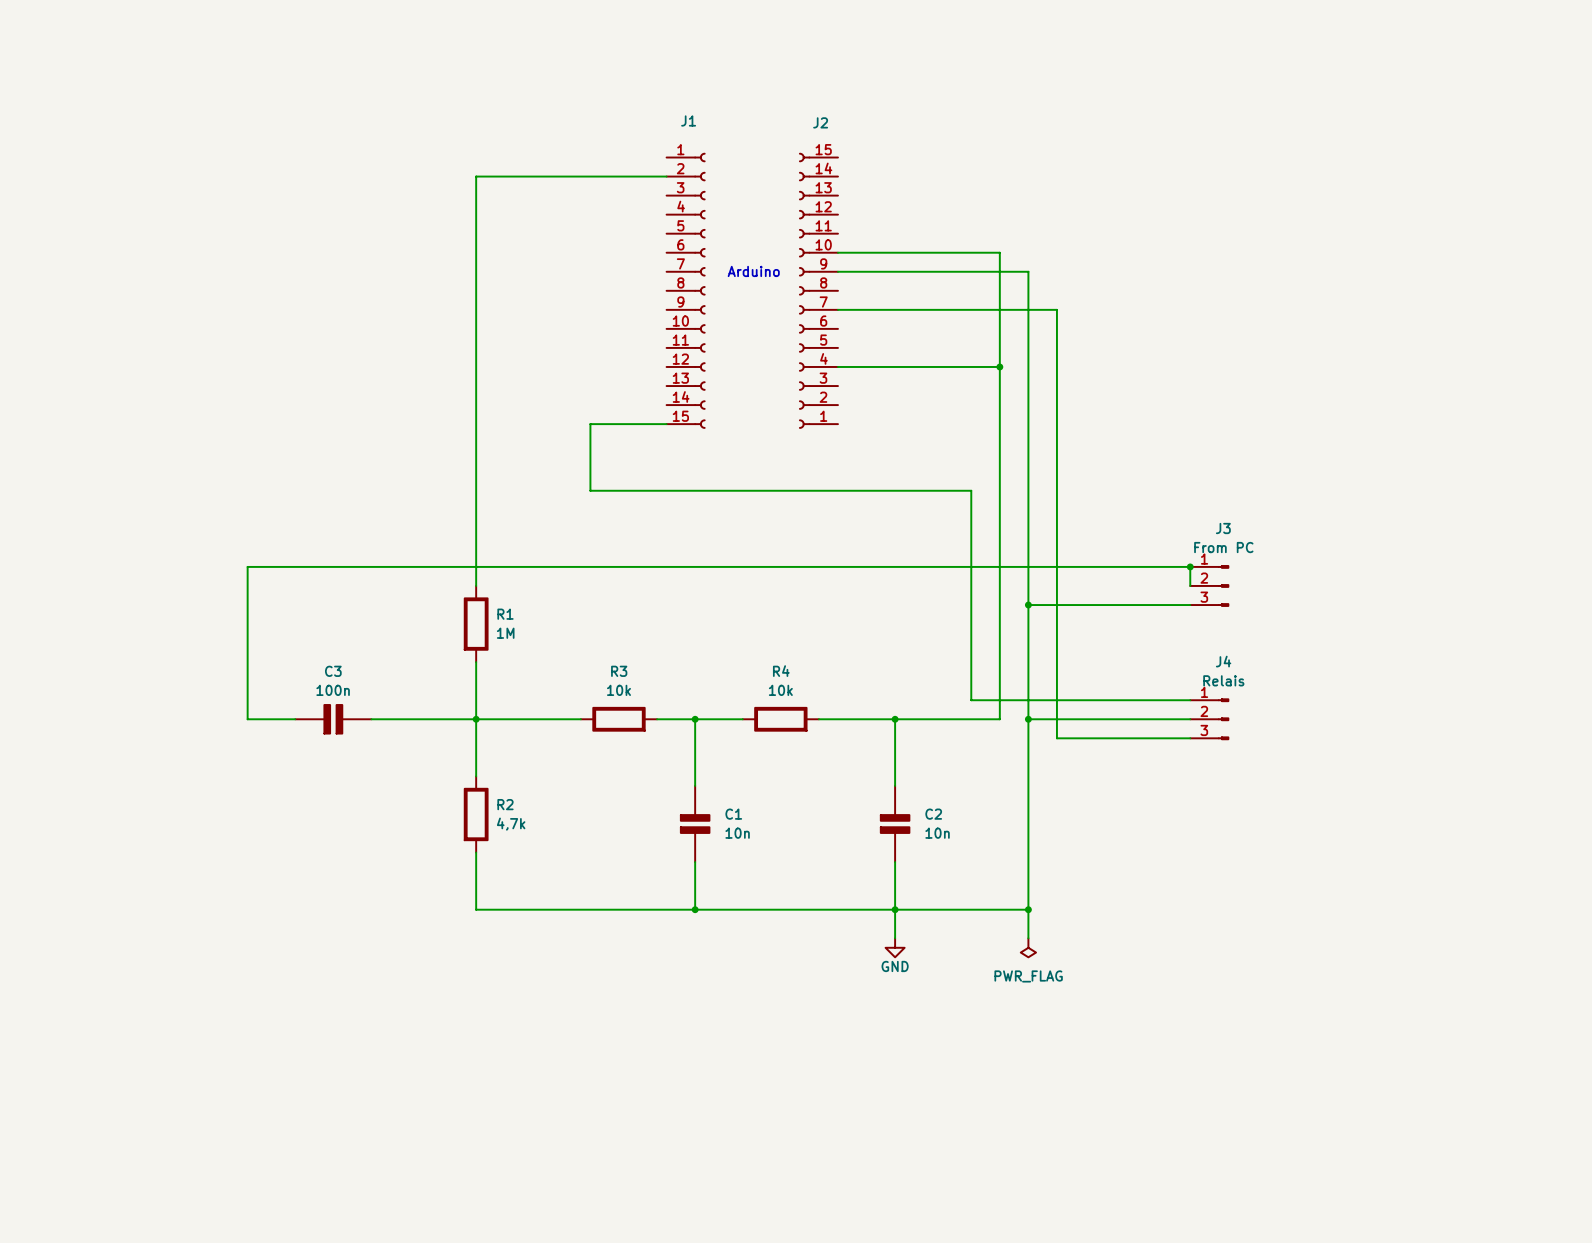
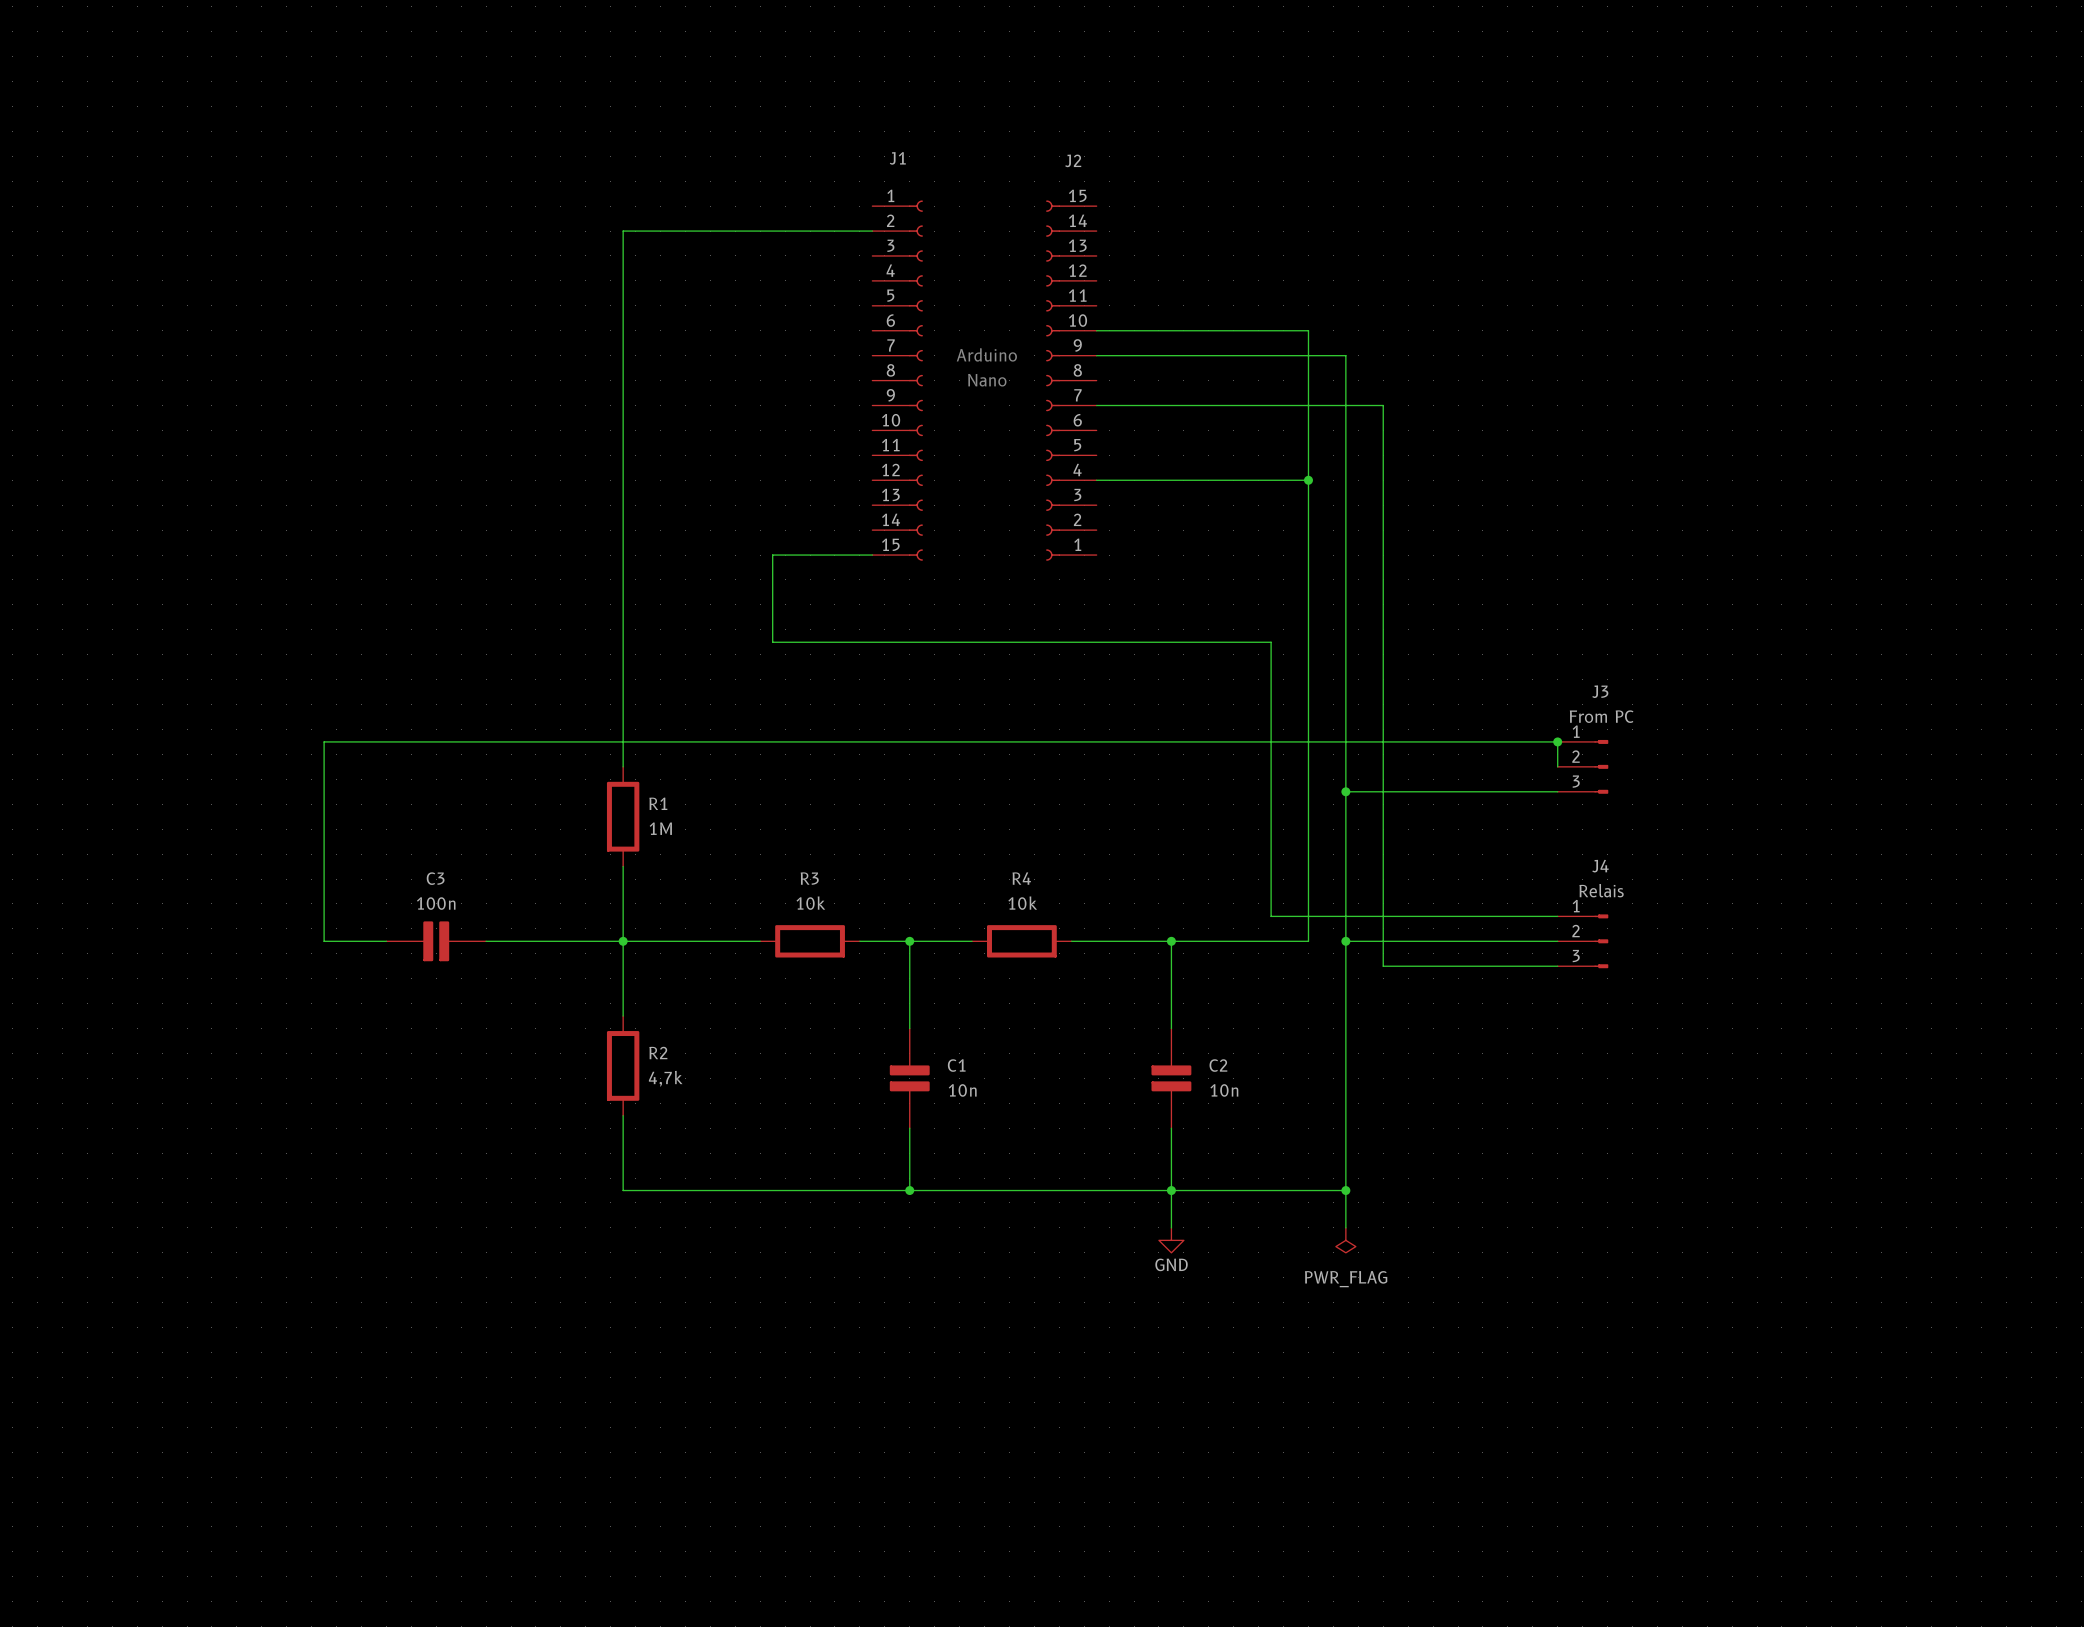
text: none -> Nano (987, 380)

